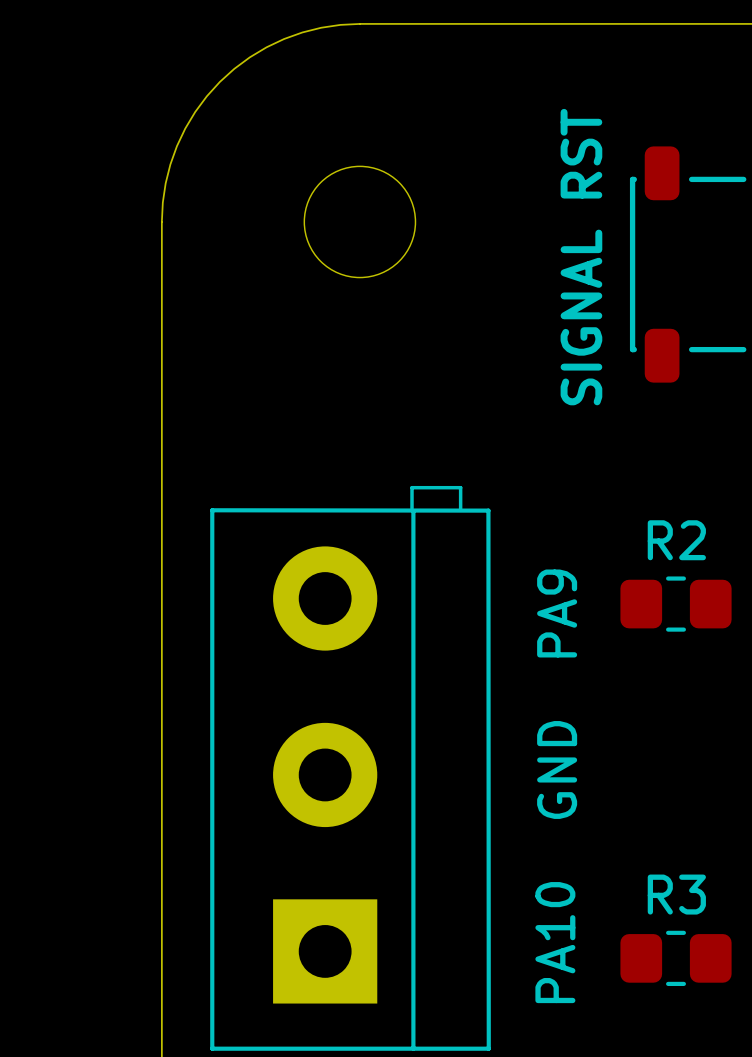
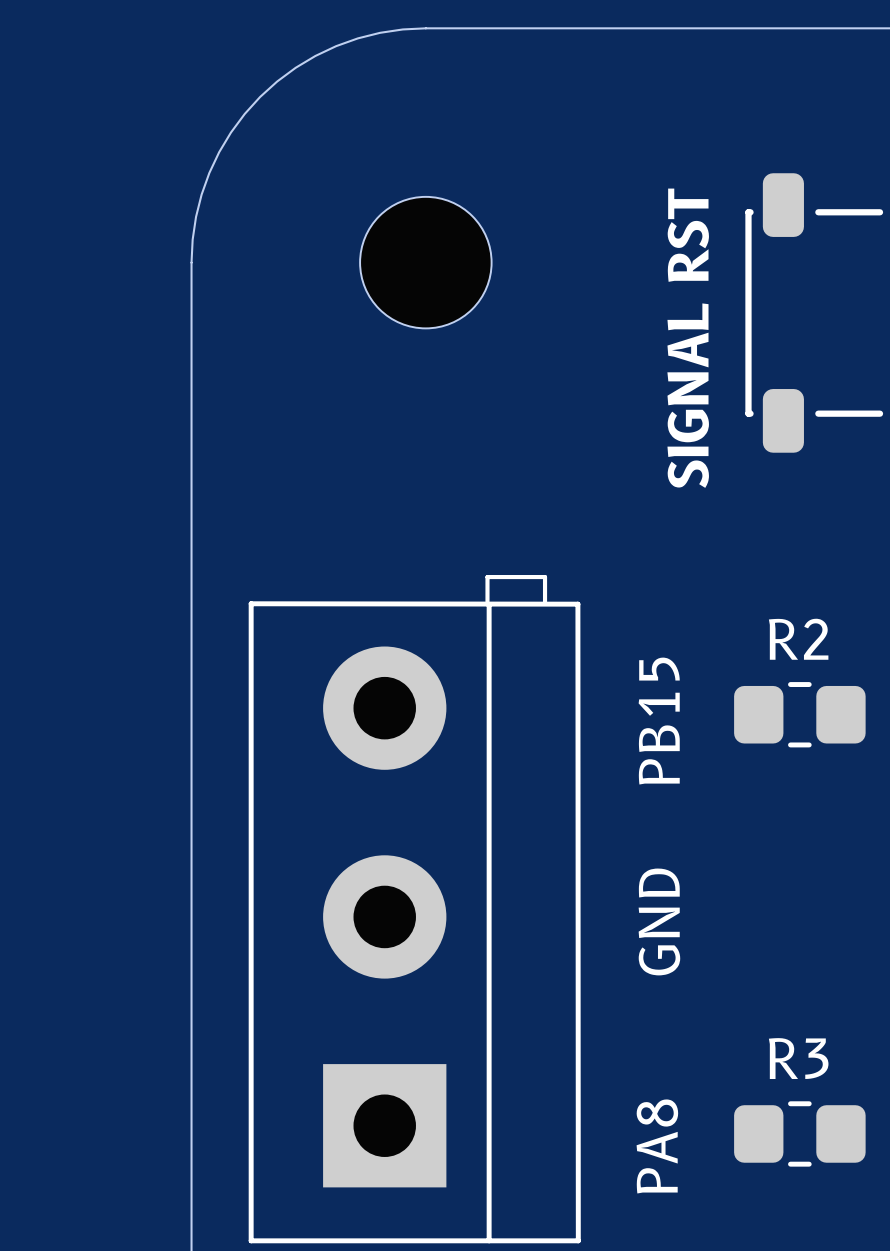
text: PA9 (557, 613) -> PB15 (659, 721)
text: PA10 (555, 942) -> PA8 (657, 1146)

